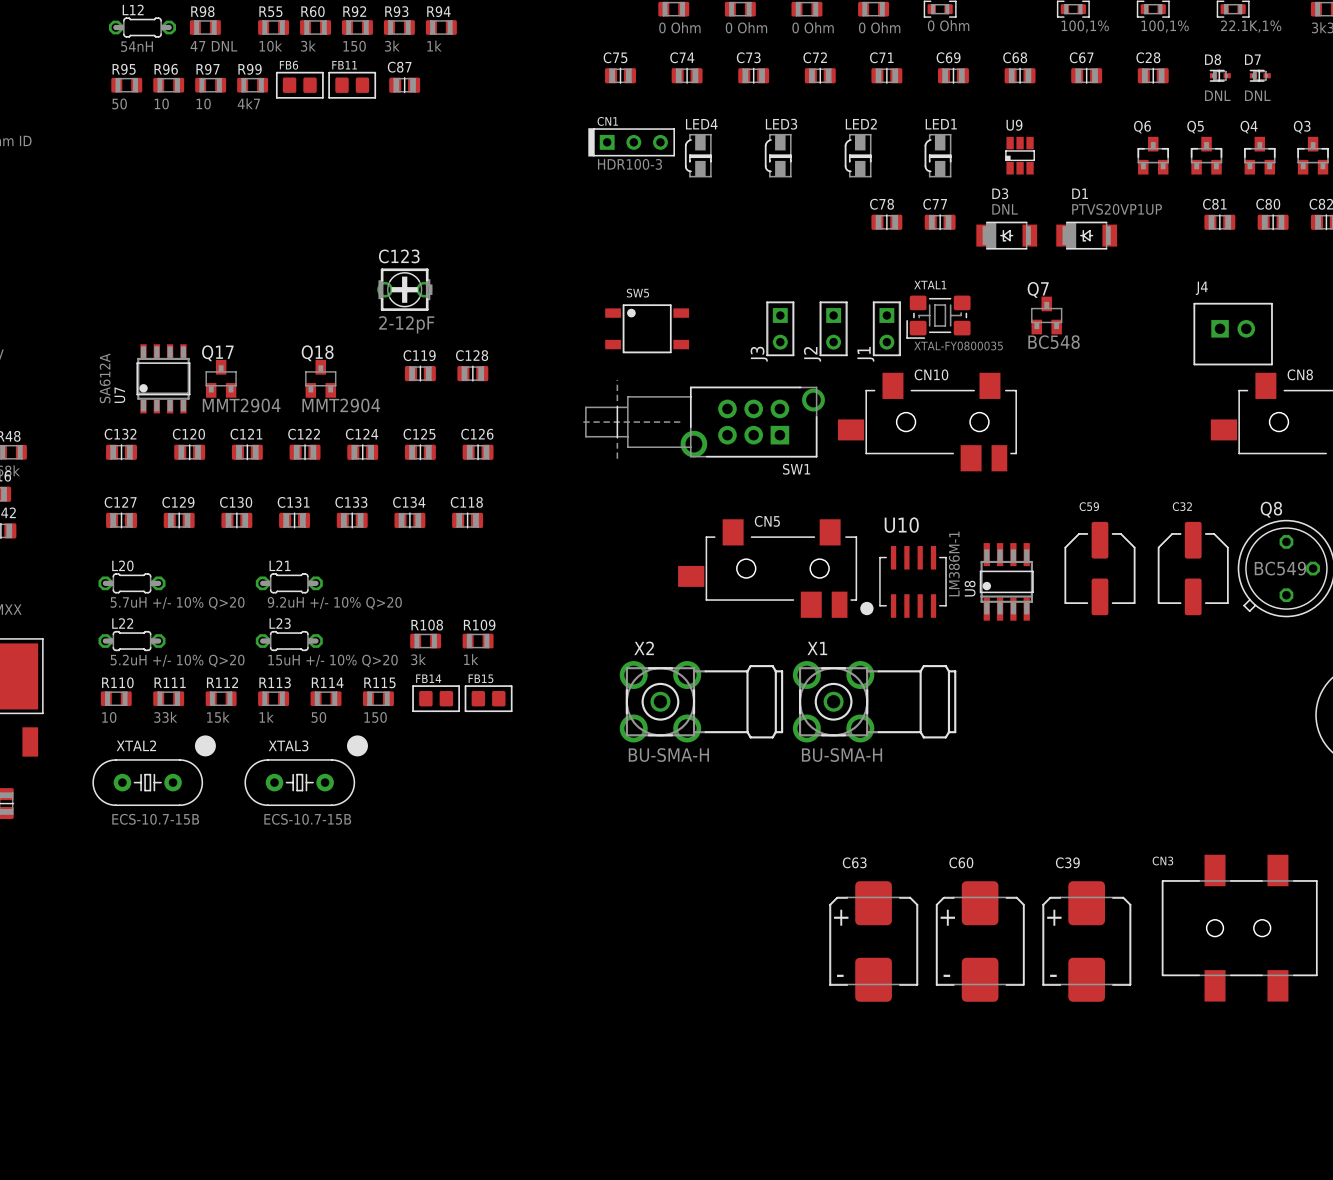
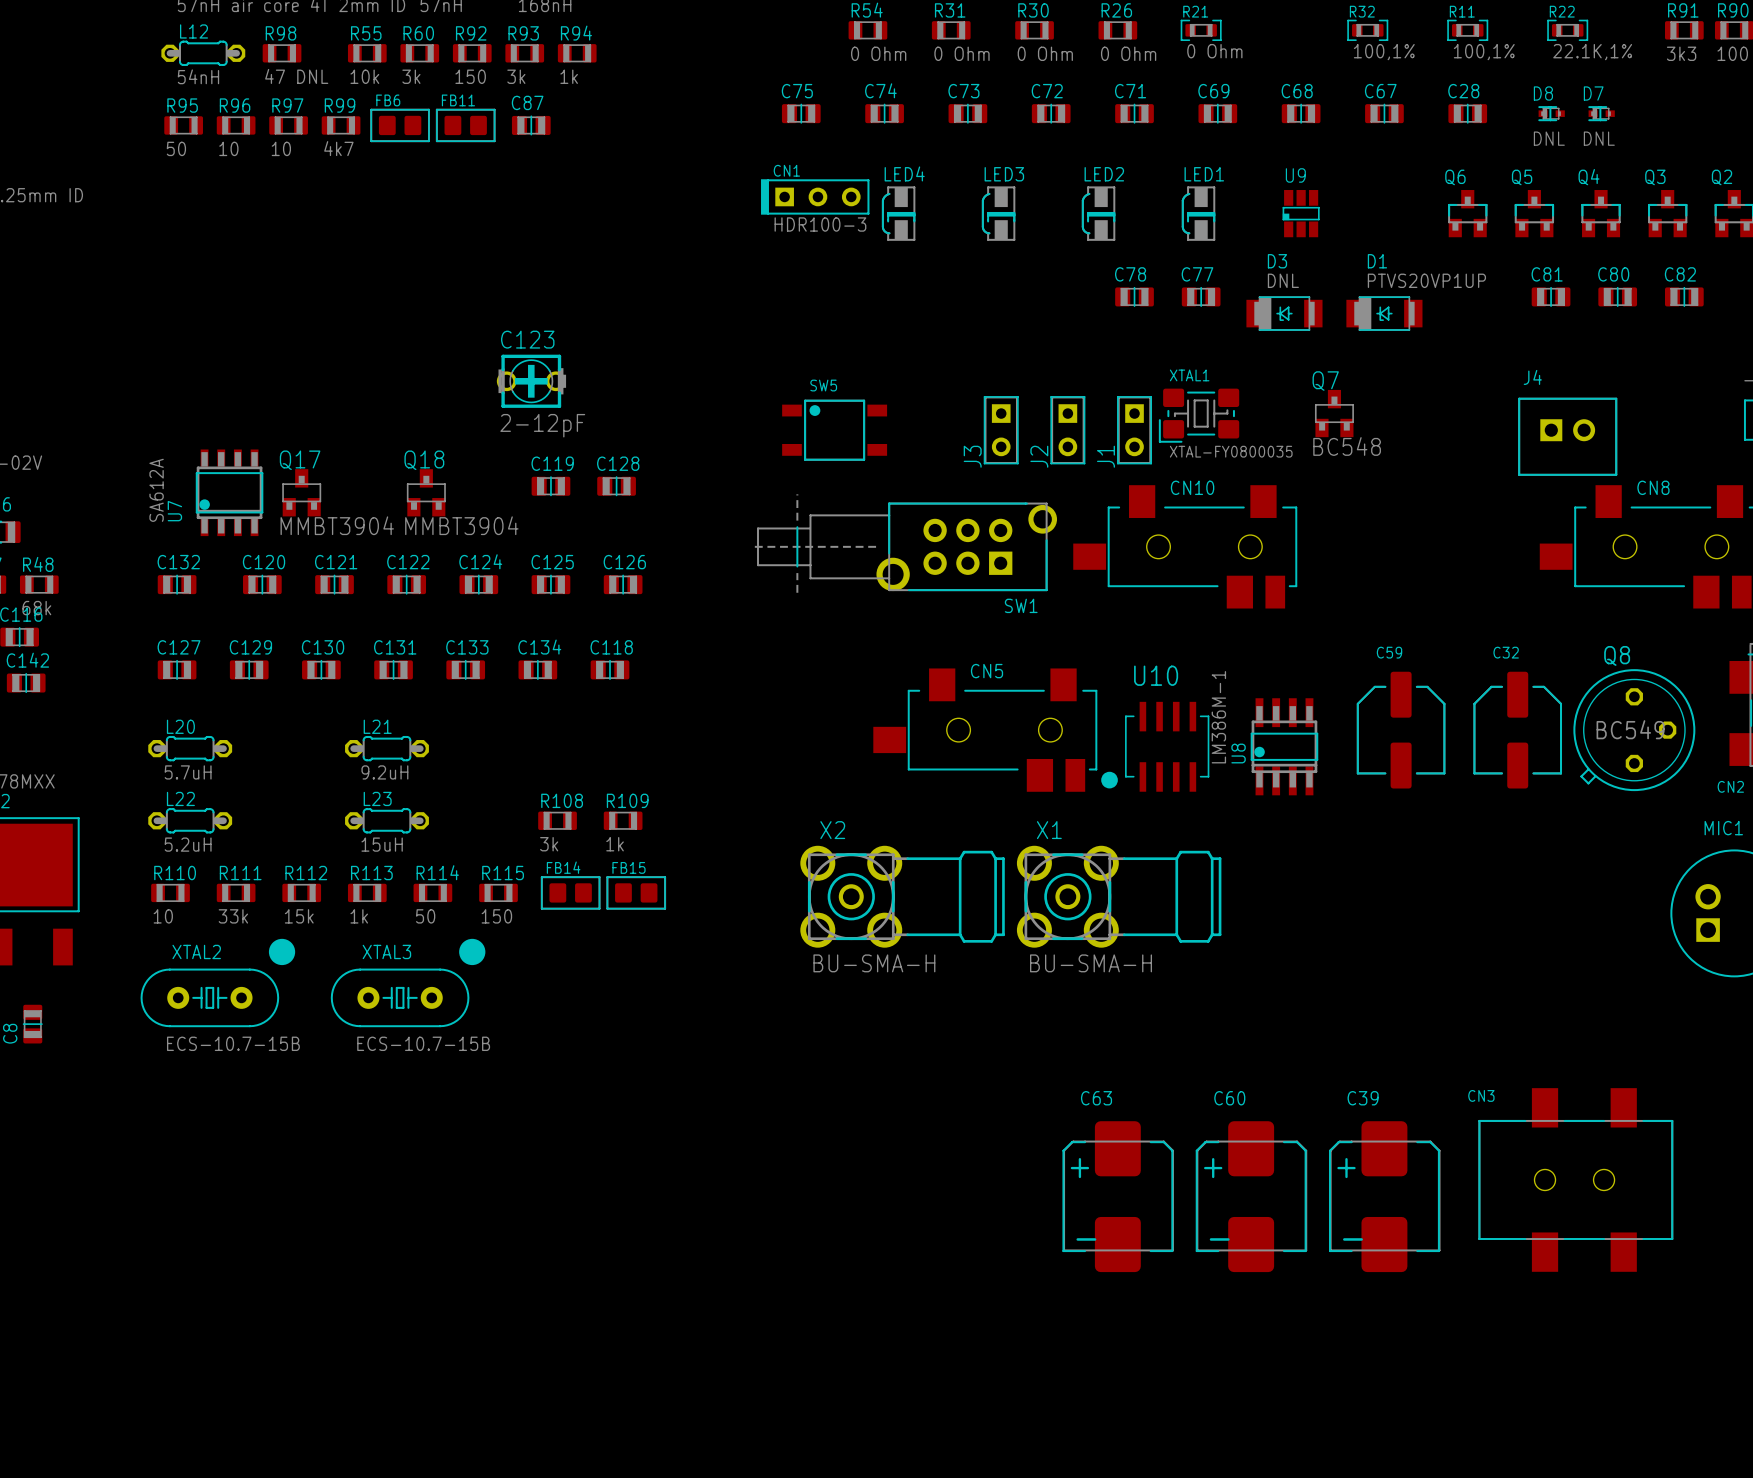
Q17 value: MMT2904 (241, 405) -> MMBT3904 (337, 525)
Q18 value: MMT2904 (341, 405) -> MMBT3904 (461, 525)
L20 value: 5.7uH +/- 10% Q>20 (177, 603) -> 5.7uH (188, 772)
L21 value: 9.2uH +/- 10% Q>20 (334, 603) -> 9.2uH (384, 772)
L22 value: 5.2uH +/- 10% Q>20 (177, 660) -> 5.2uH (188, 844)
L23 value: 15uH +/- 10% Q>20 (333, 660) -> 15uH (382, 844)

